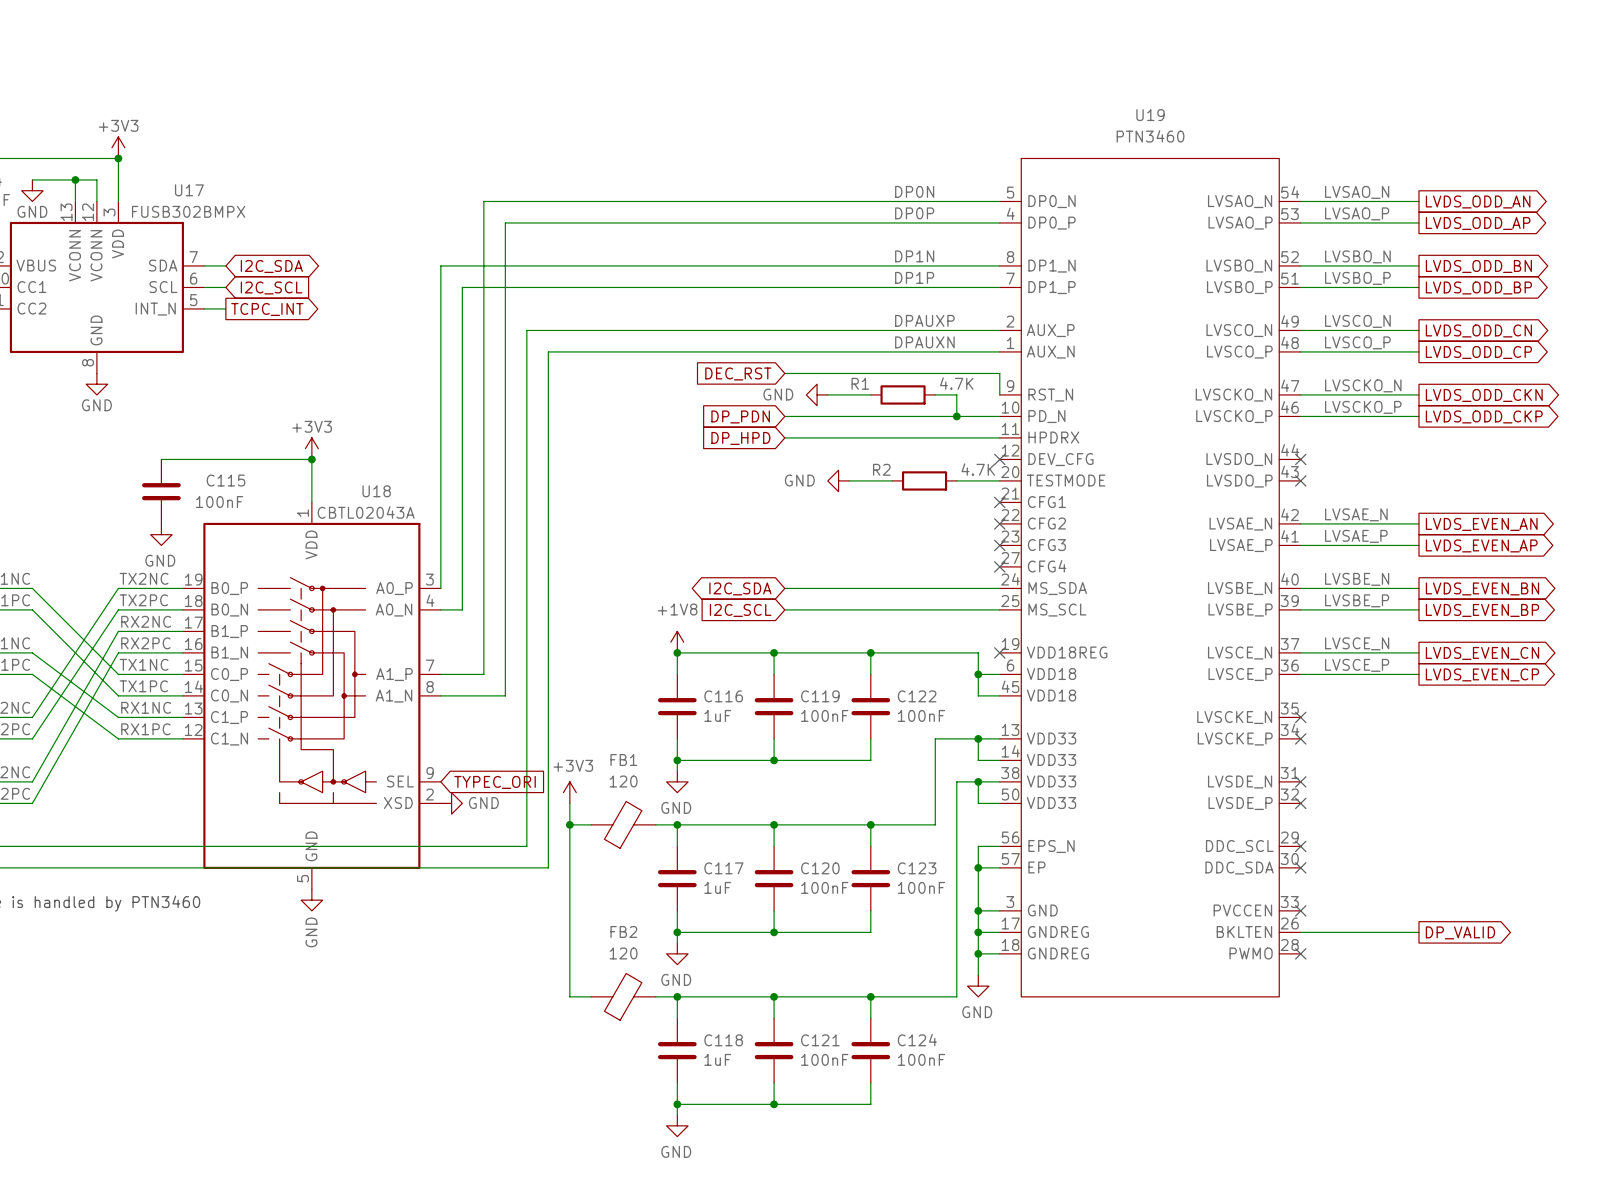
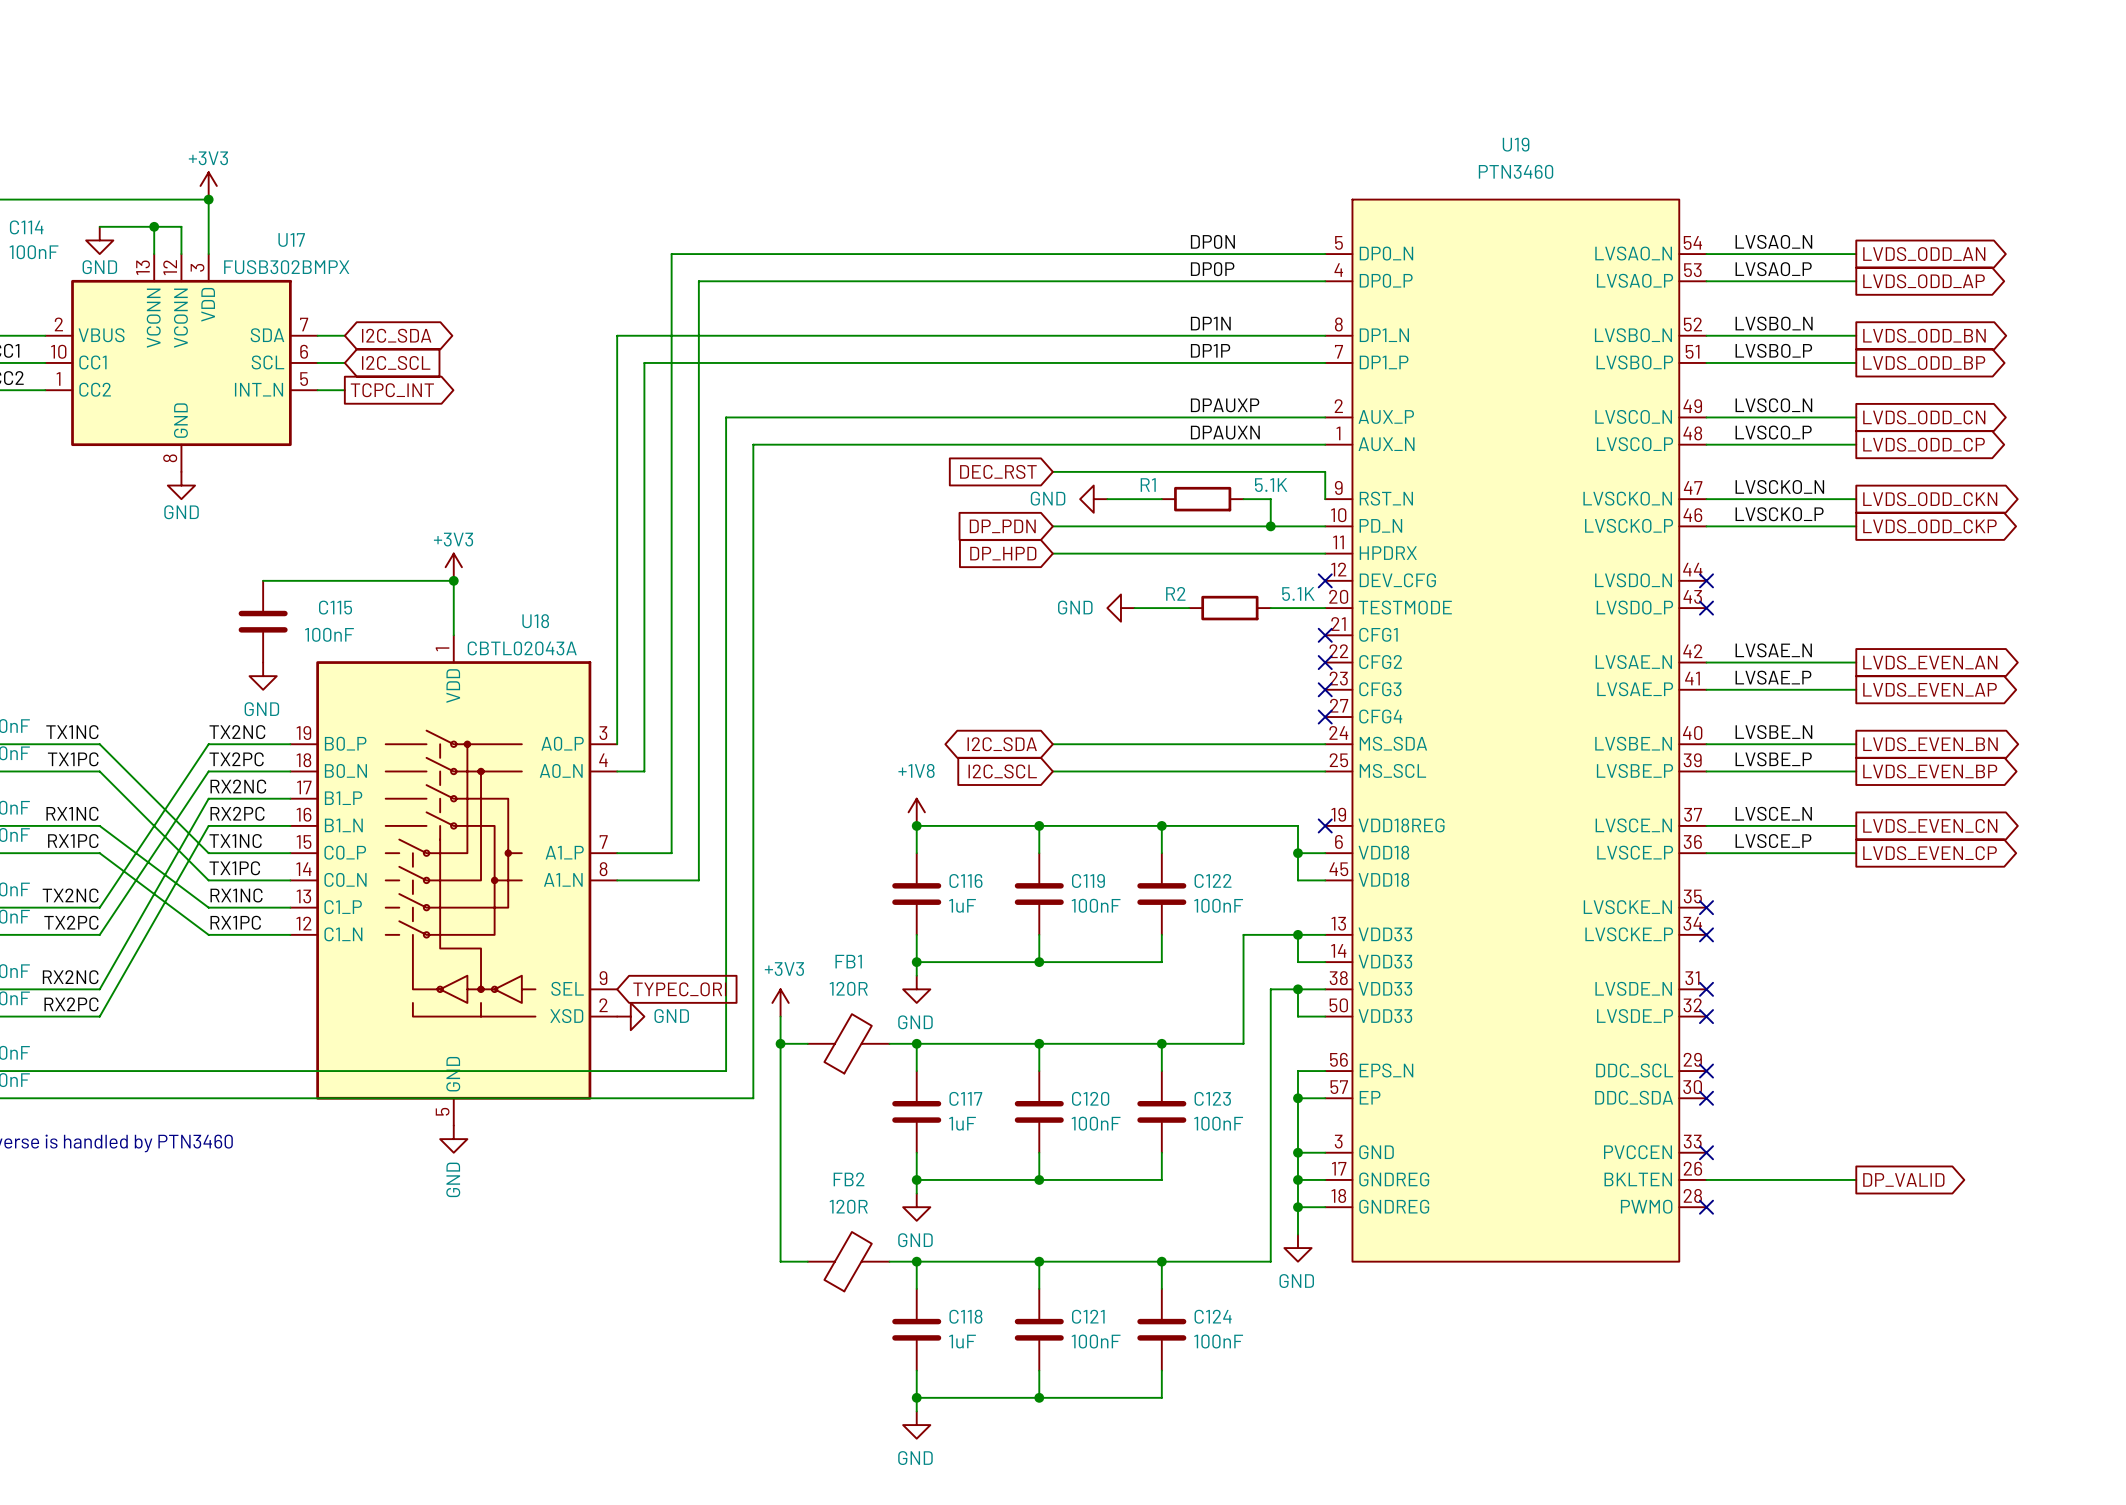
R1 value: 4.7K (956, 383) -> 5.1K (1271, 485)
R2 value: 4.7K (978, 469) -> 5.1K (1298, 594)
FB1 value: 120 (623, 781) -> 120R (848, 988)
FB2 value: 120 (623, 953) -> 120R (848, 1206)

